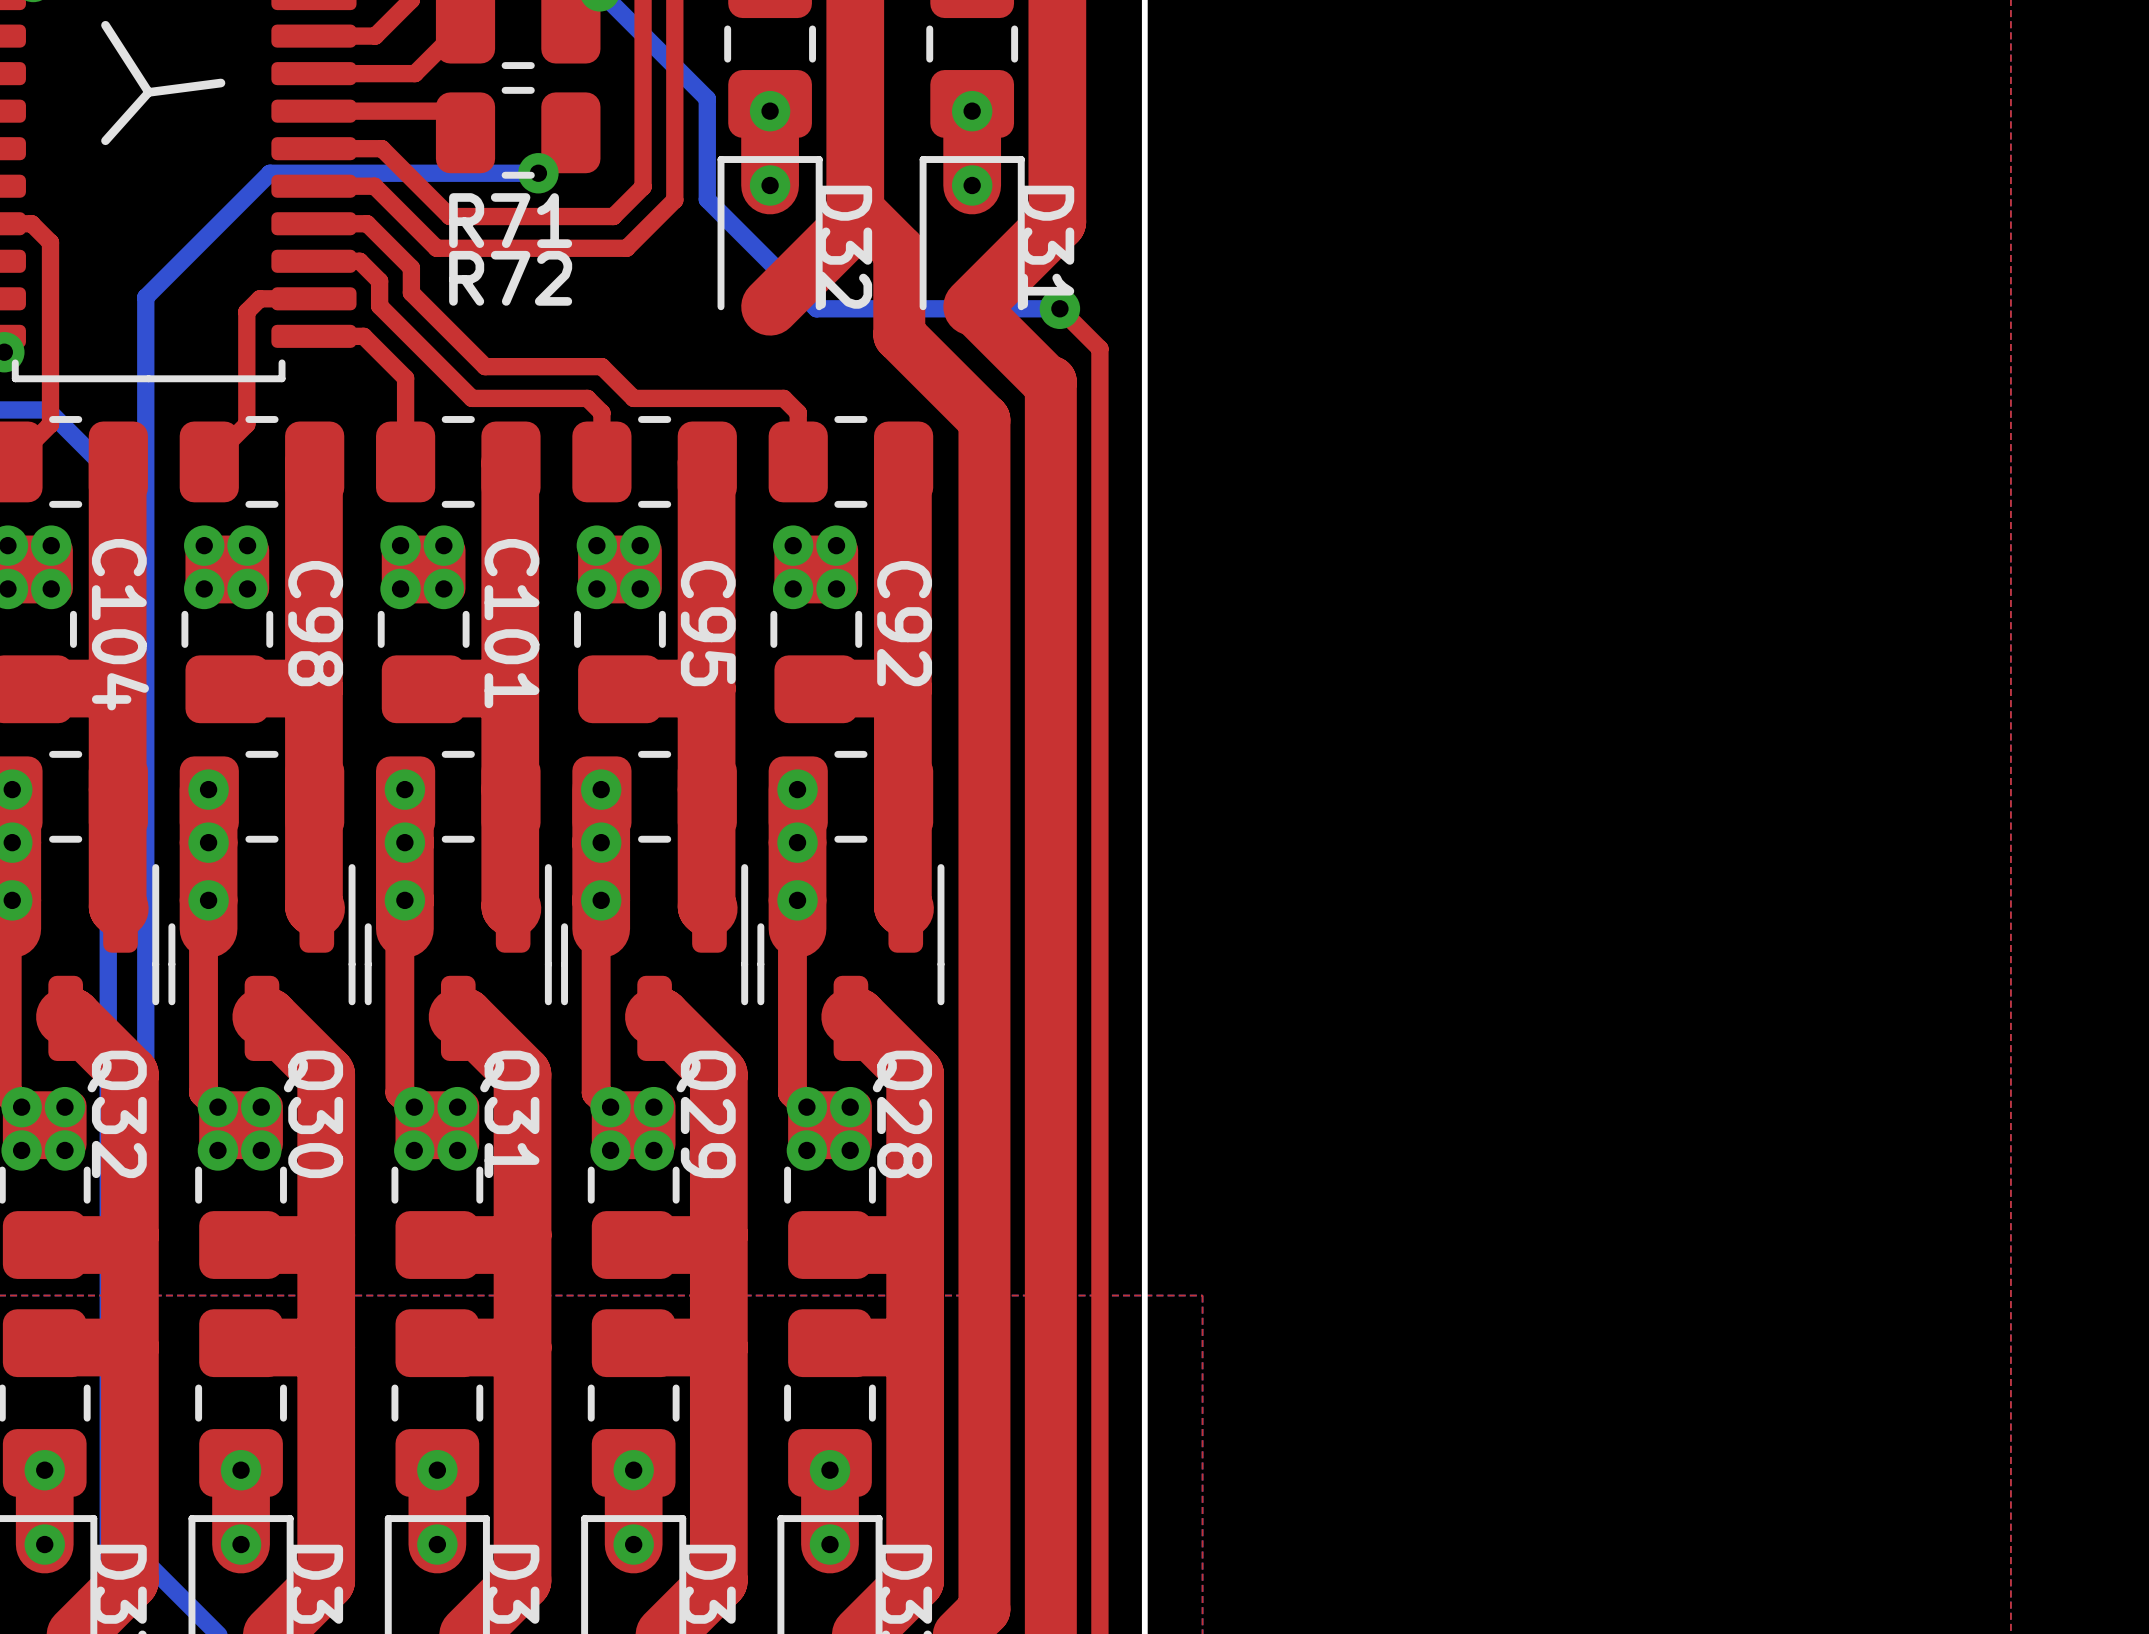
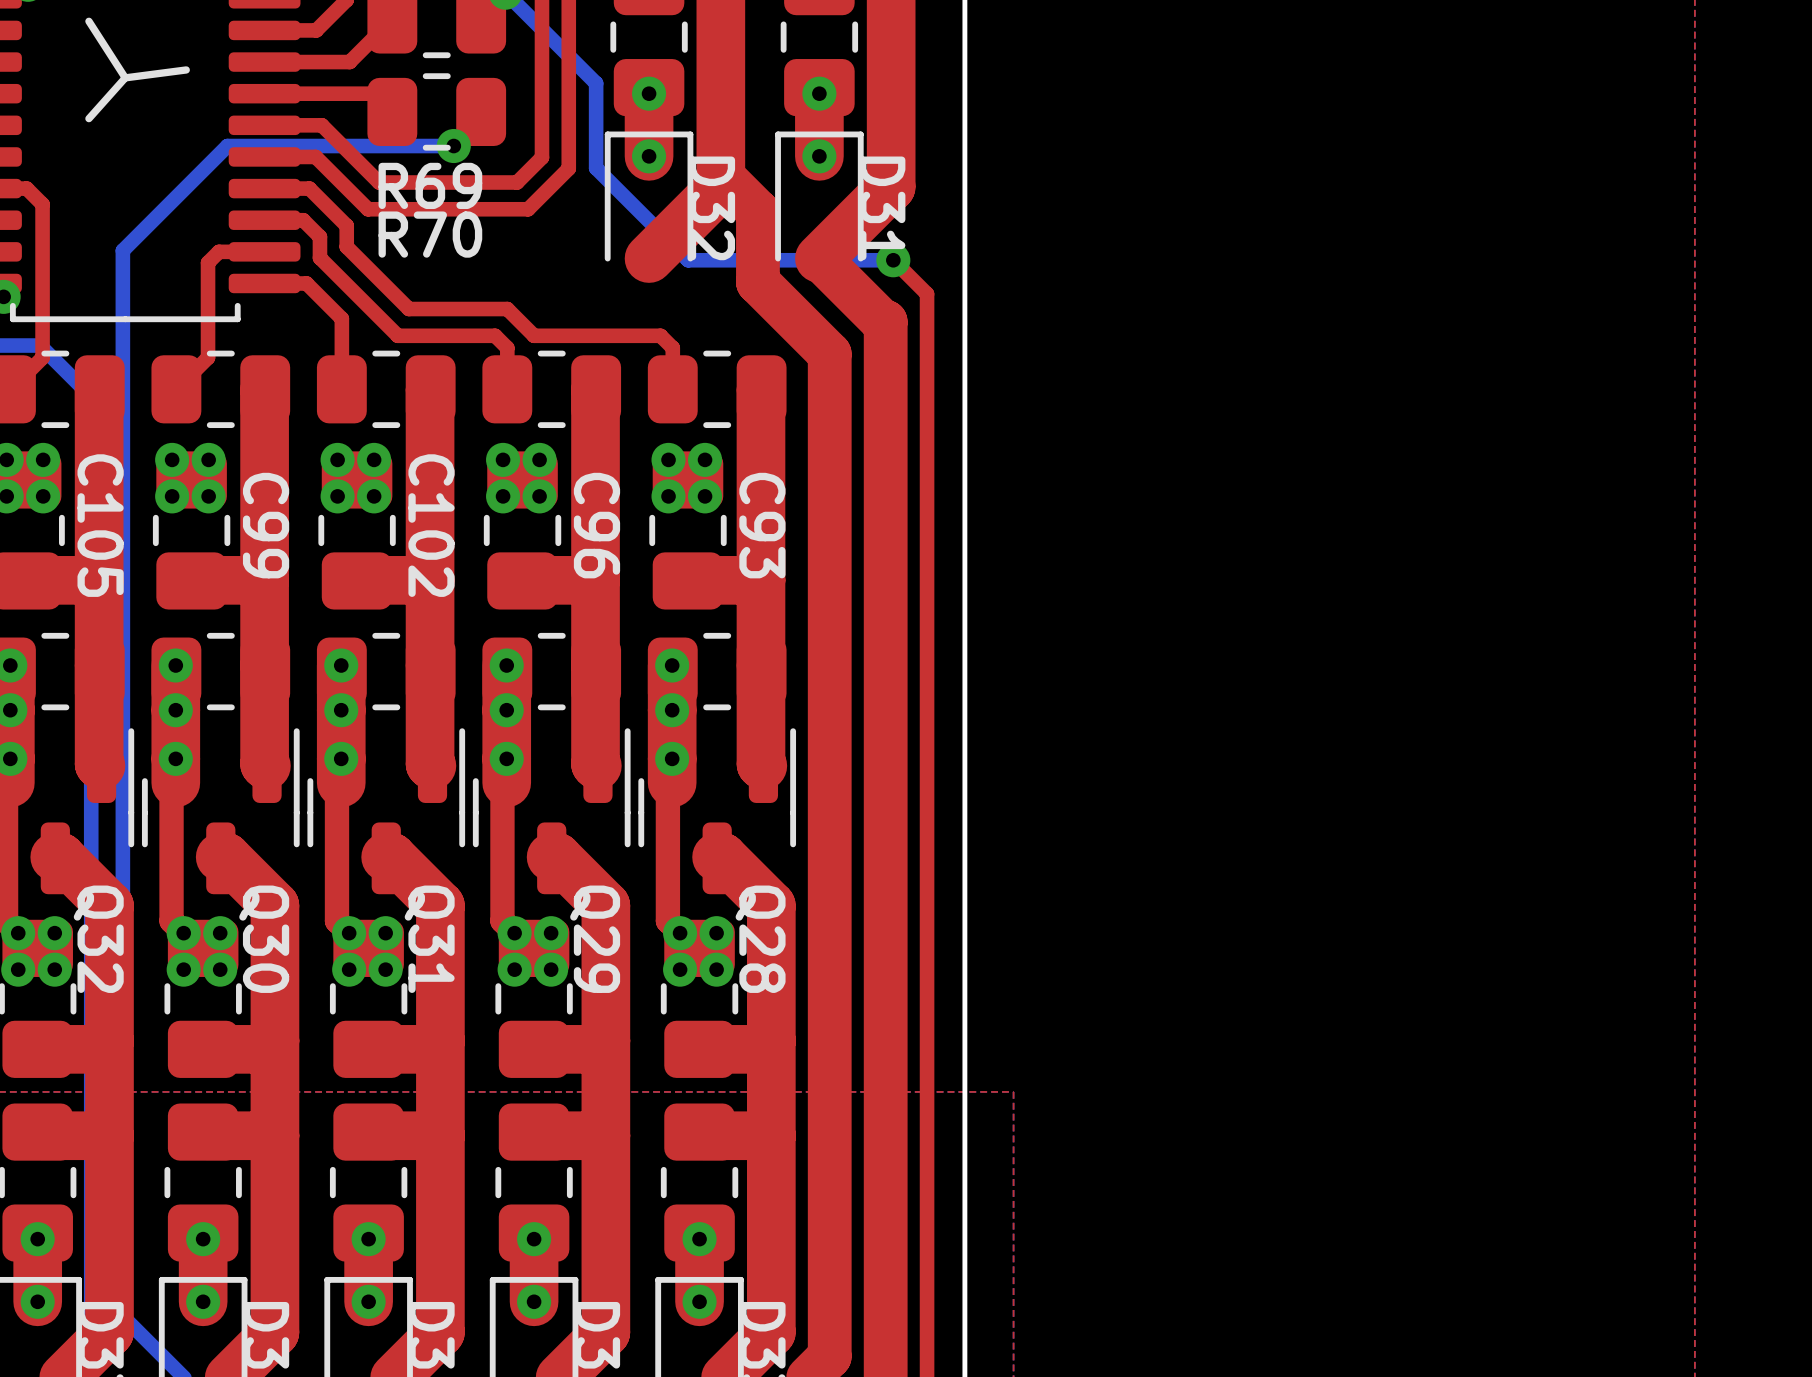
R71 name: R71 (510, 220) -> R69 (430, 185)
R72 name: R72 (510, 278) -> R70 (430, 234)
C98 name: C98 (315, 623) -> C99 (266, 525)
C101 name: C101 (511, 623) -> C102 (431, 525)
C95 name: C95 (708, 623) -> C96 (596, 525)
C92 name: C92 (904, 623) -> C93 (762, 525)
C104 name: C104 (120, 624) -> C105 (100, 525)

